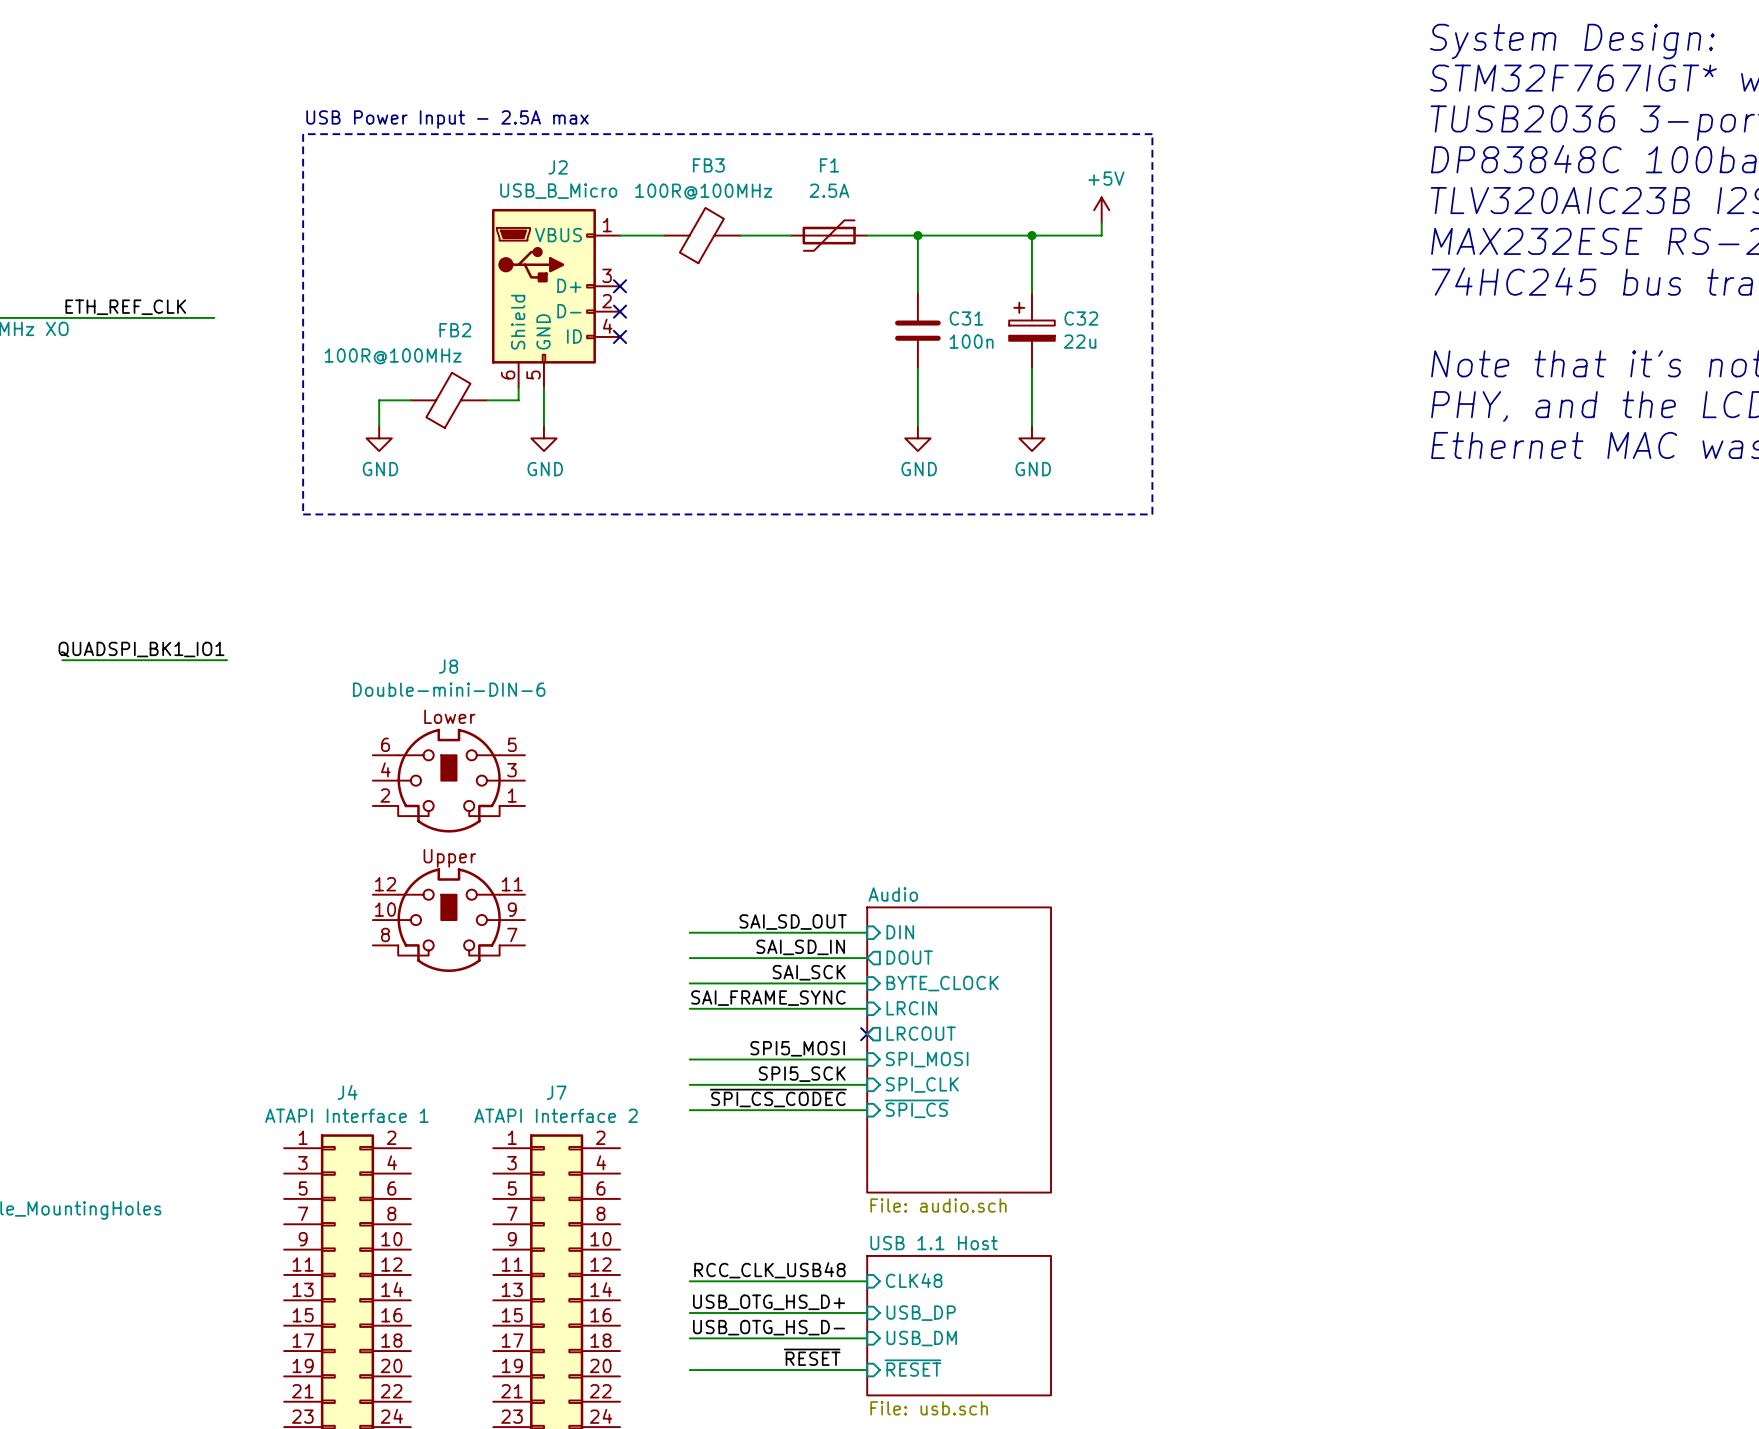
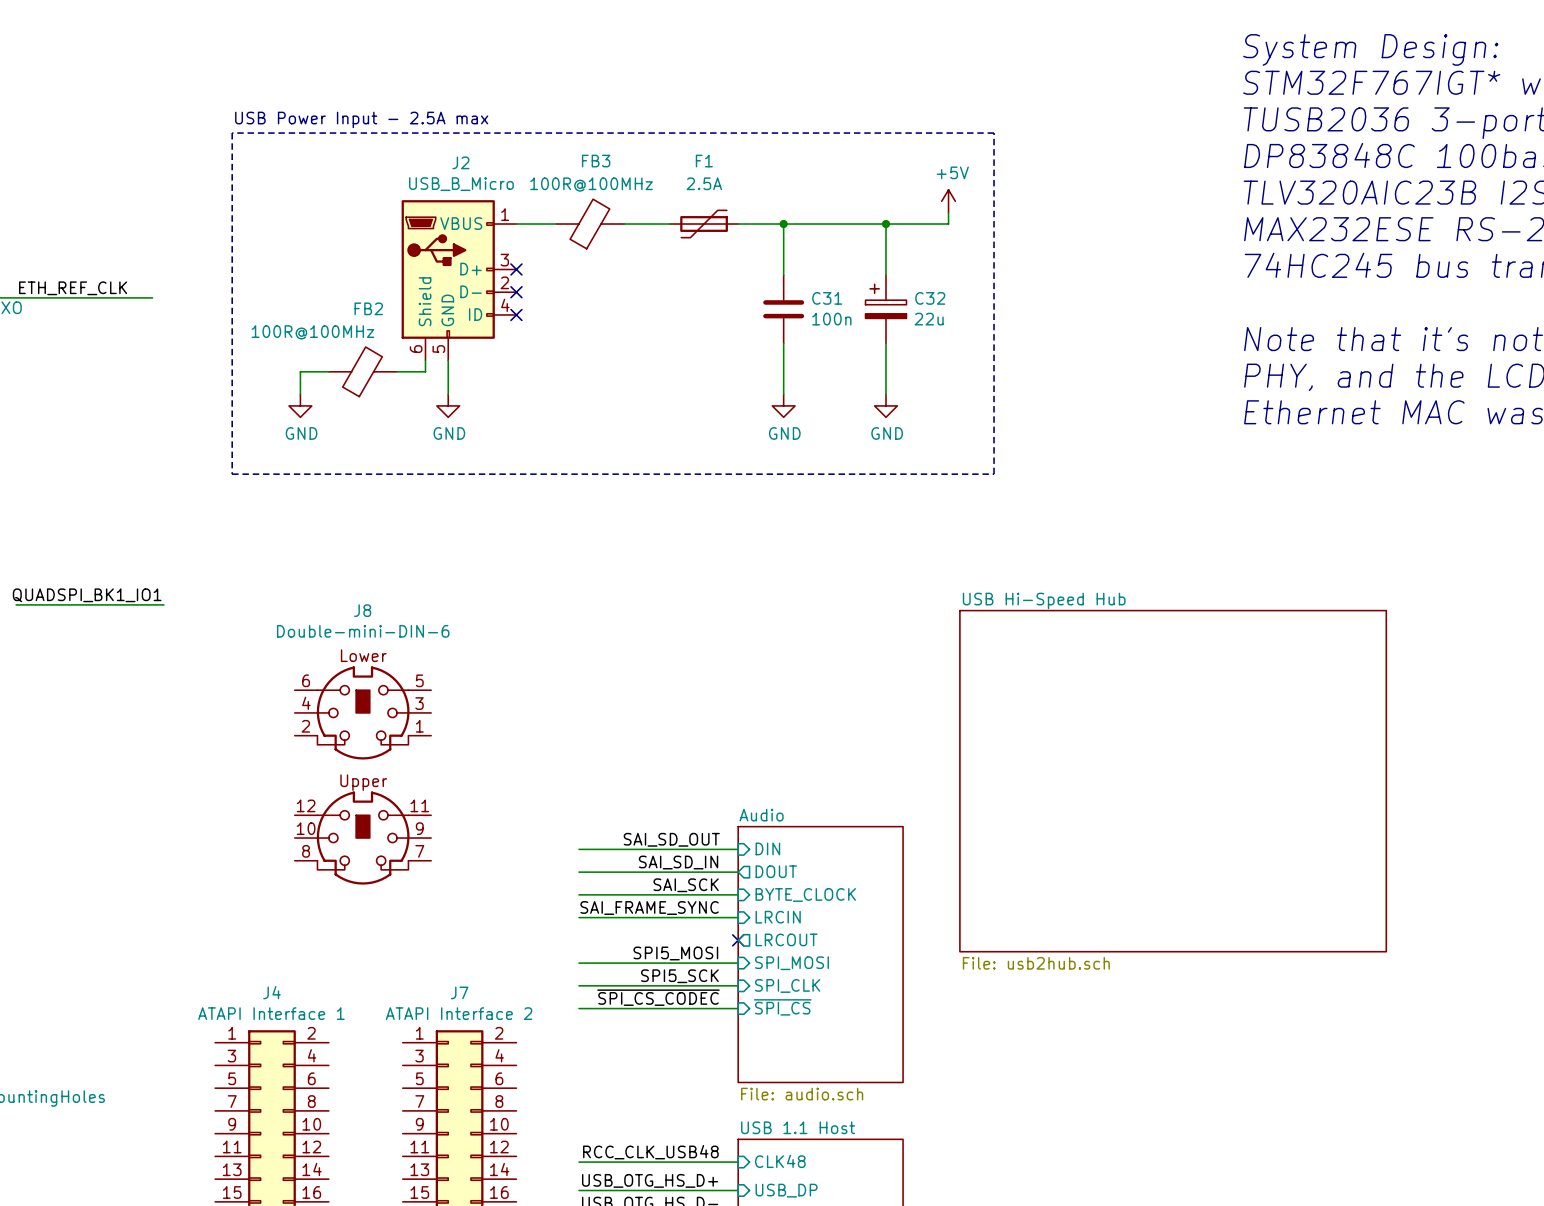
sheet USB Hi-Speed Hub: none -> File: usb2hub.sch (1173, 781)

